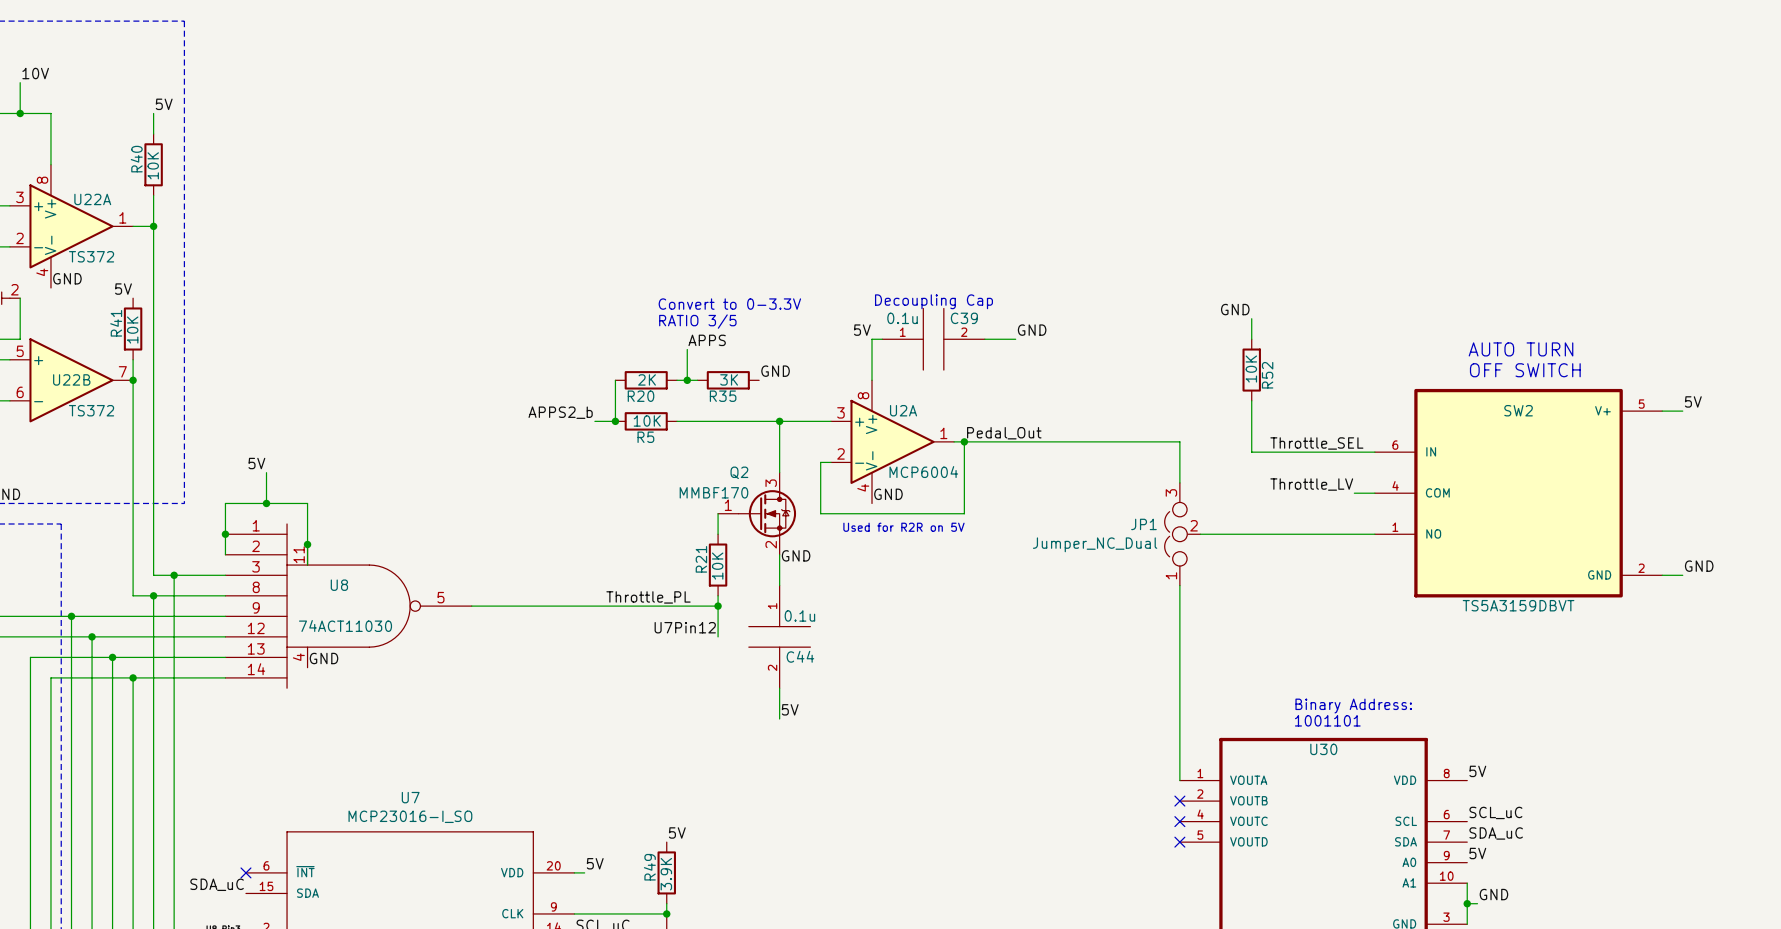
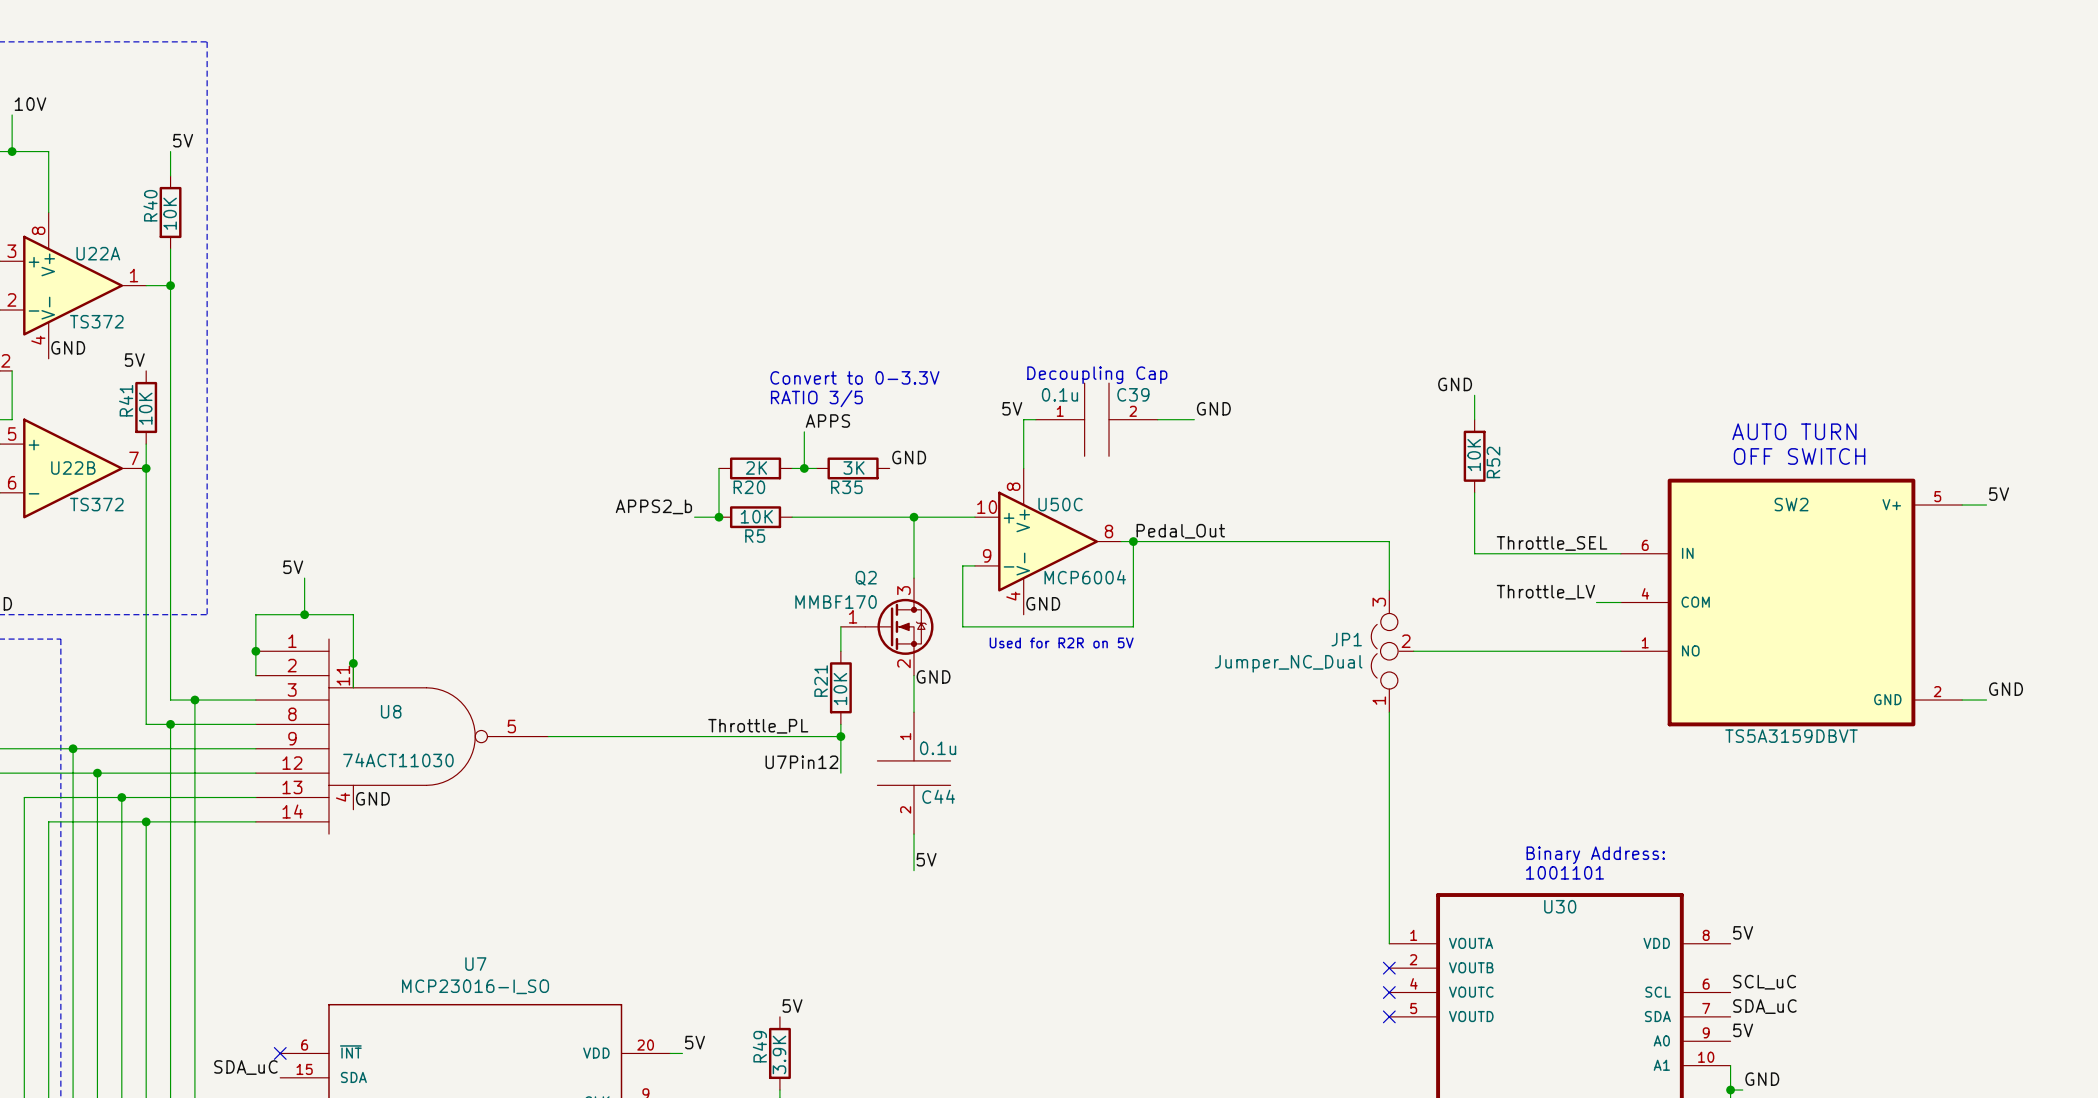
U2A name: U2A (903, 410) -> U50C (1060, 504)
U2A pin number: 3 (840, 412) -> 10 (987, 507)
U2A pin number: 1 (943, 433) -> 8 (1109, 531)
U2A pin number: 2 (840, 453) -> 9 (987, 555)

